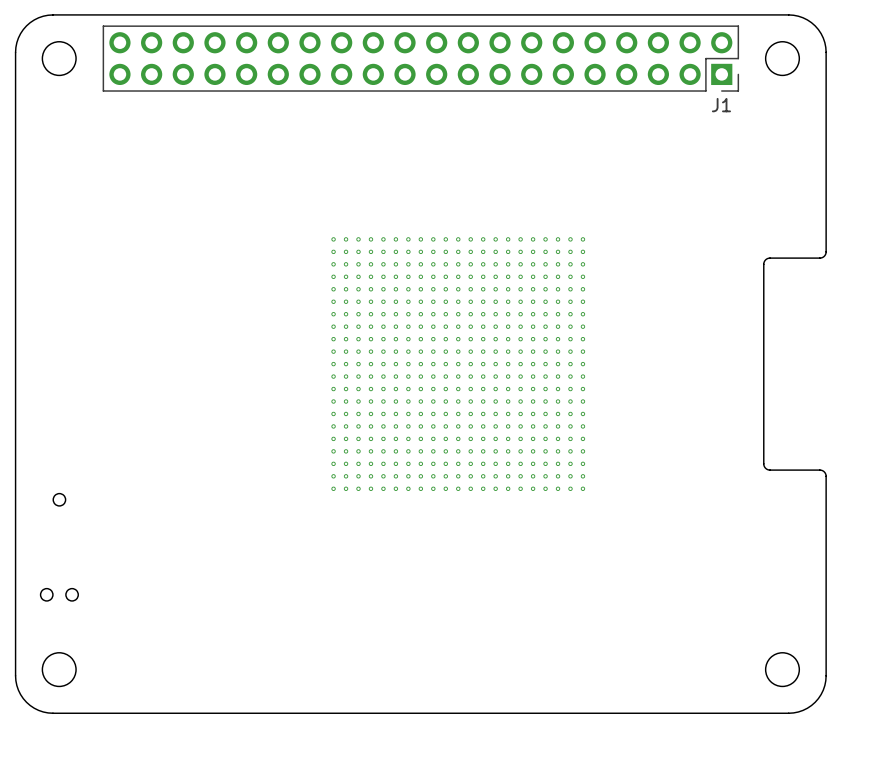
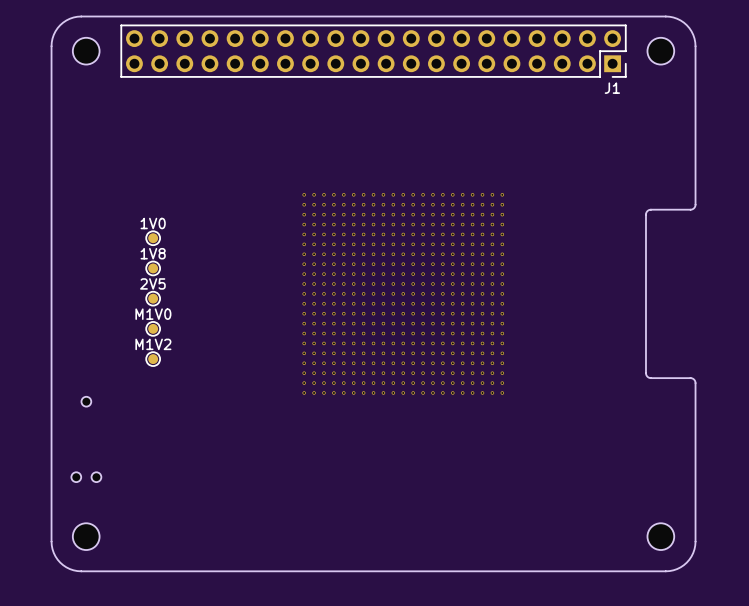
1V0: none -> (153, 238)
1V8: none -> (153, 268)
2V5: none -> (153, 298)
M1V0: none -> (153, 328)
M1V2: none -> (153, 359)

